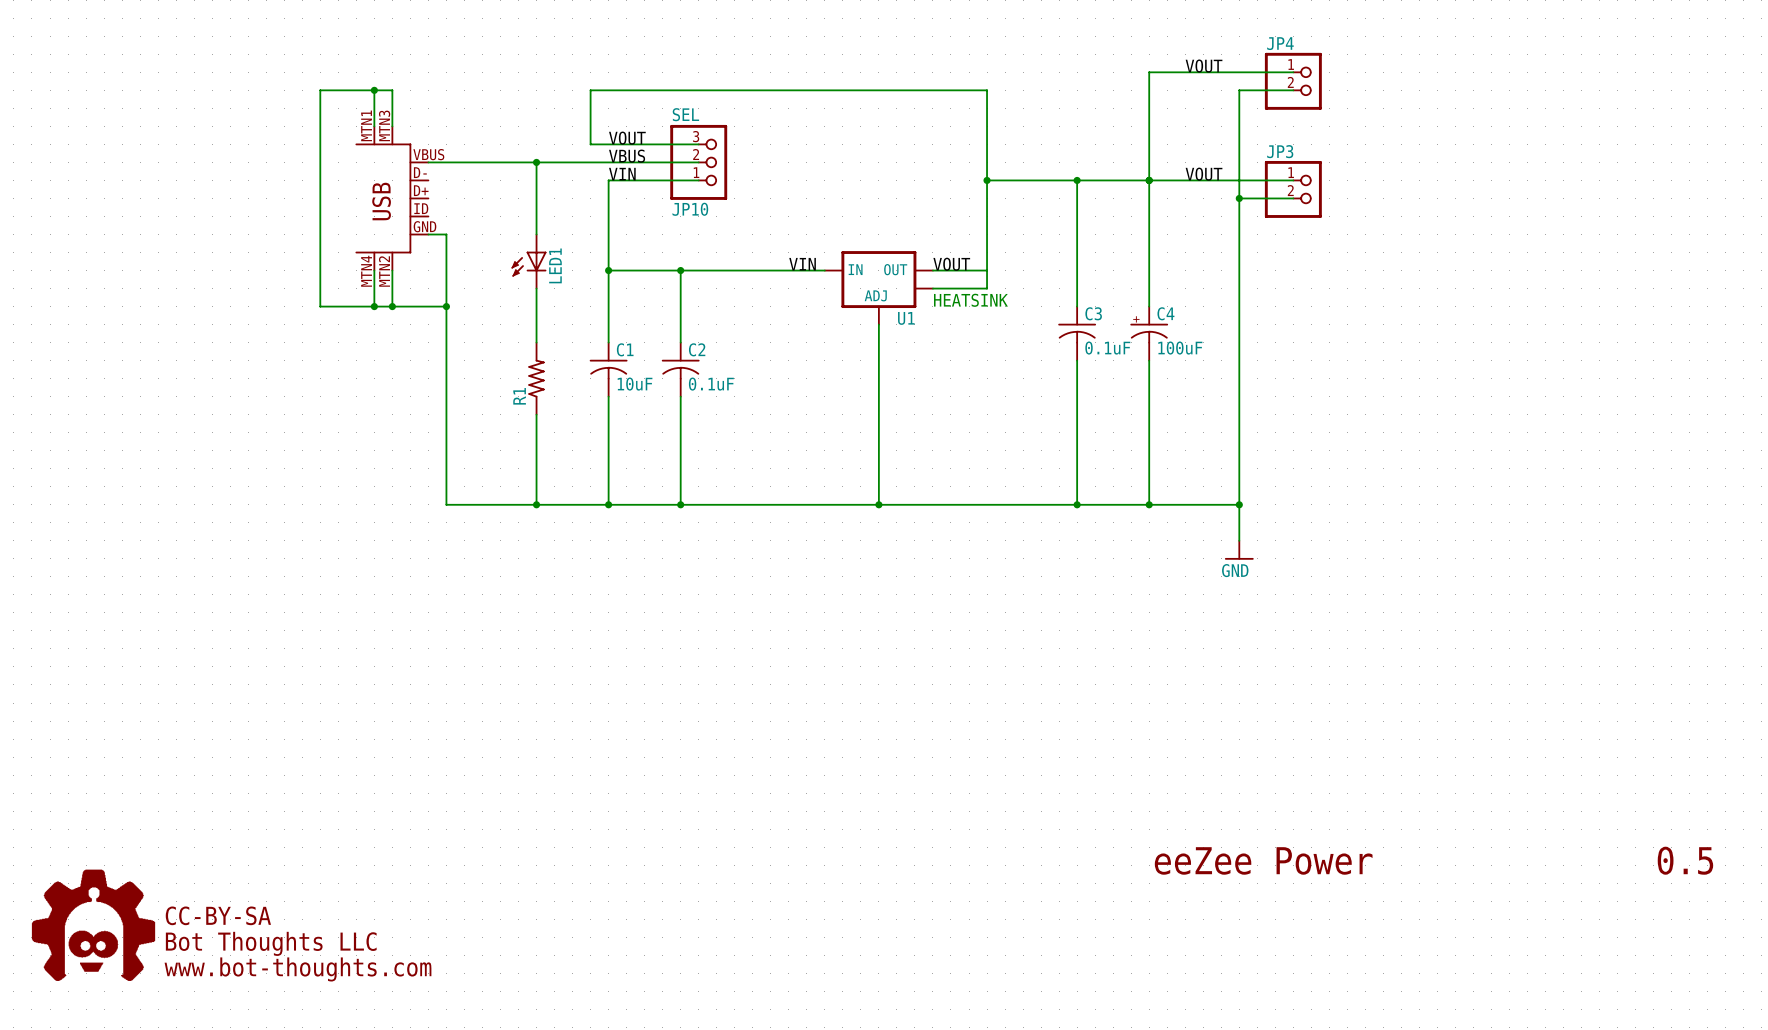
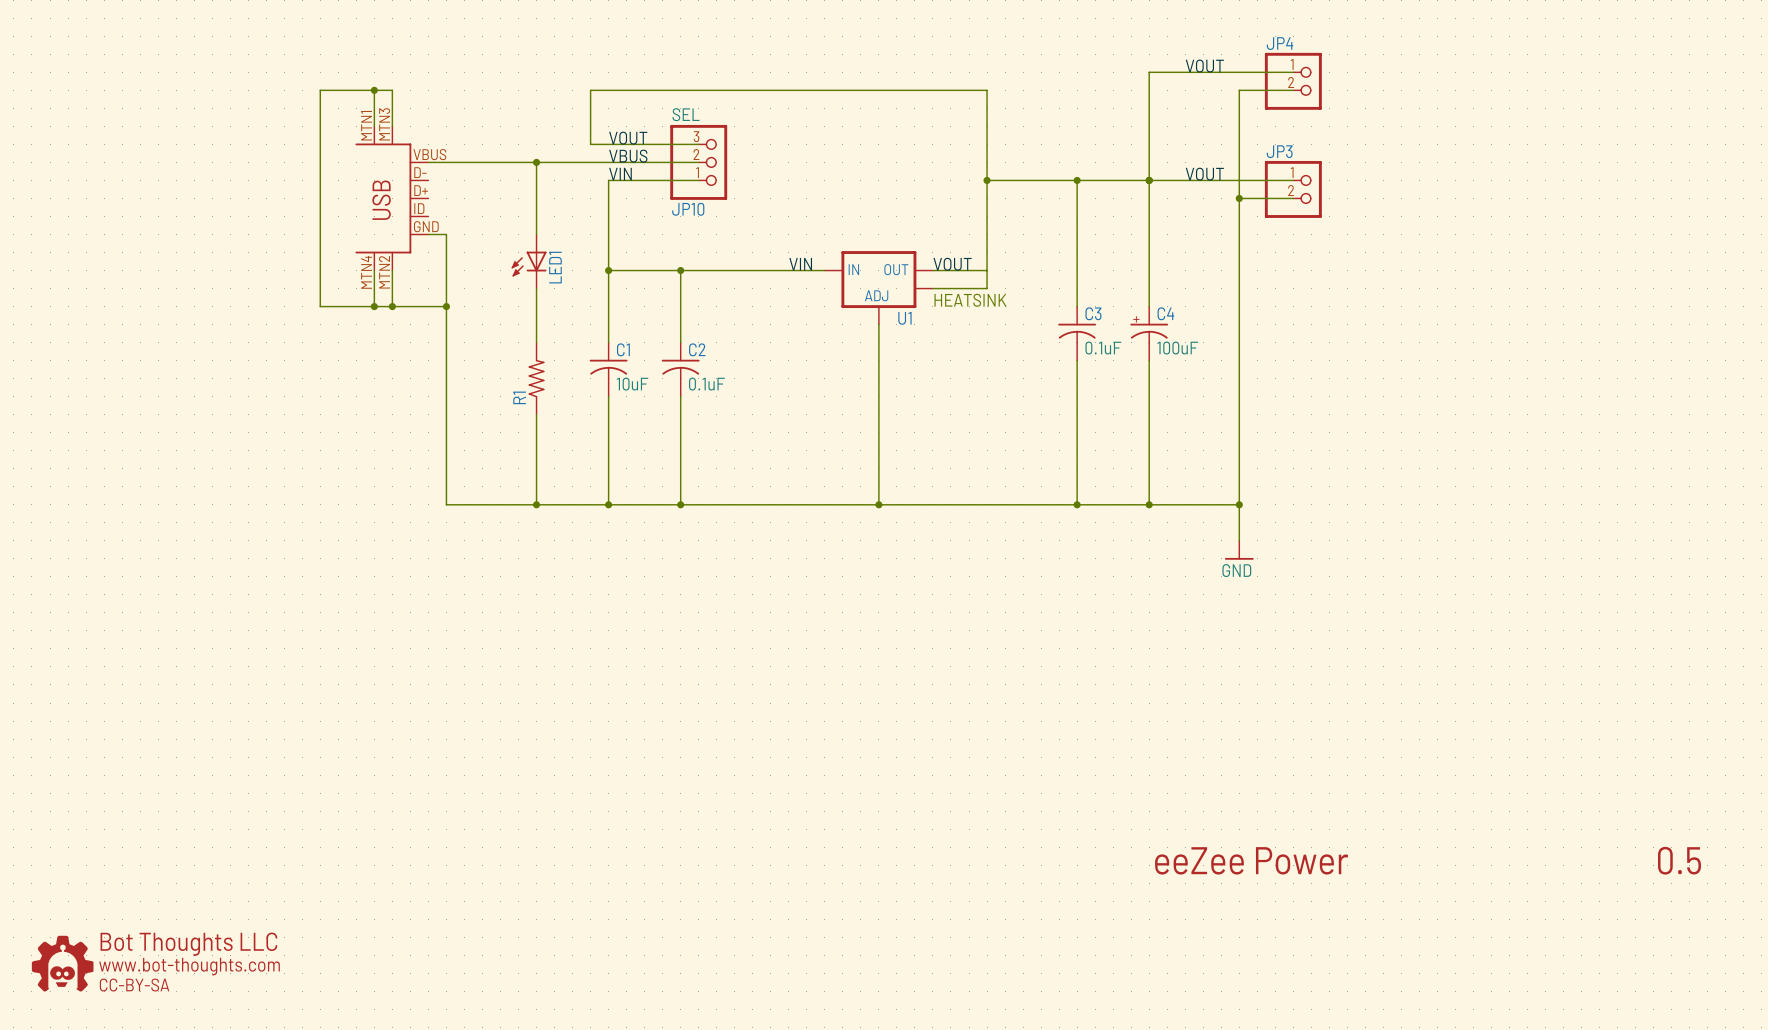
part: (93, 925) -> none
part: none -> (62, 963)

